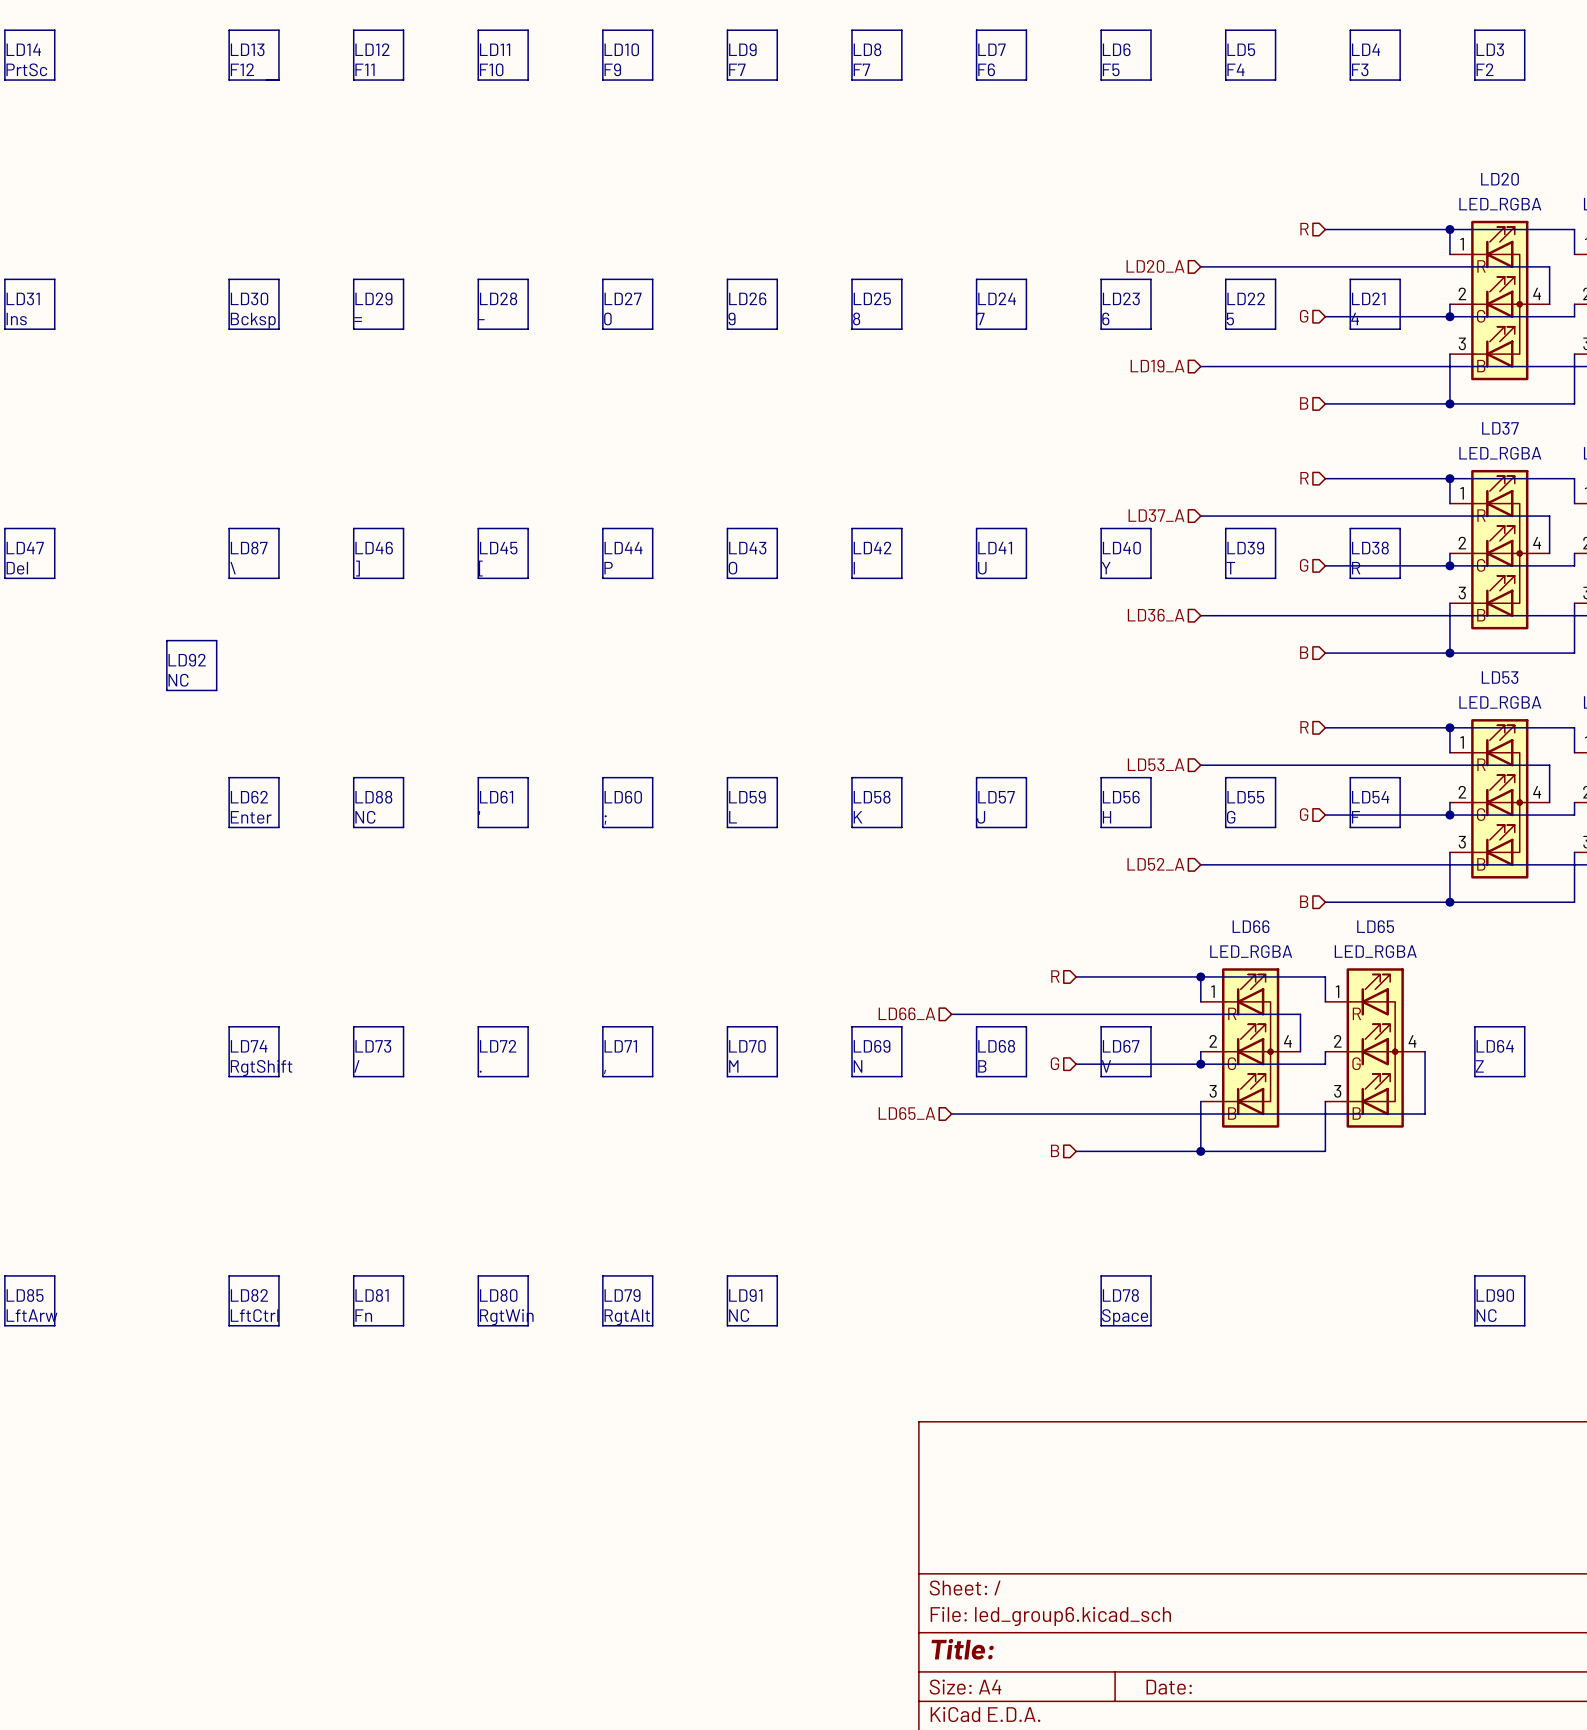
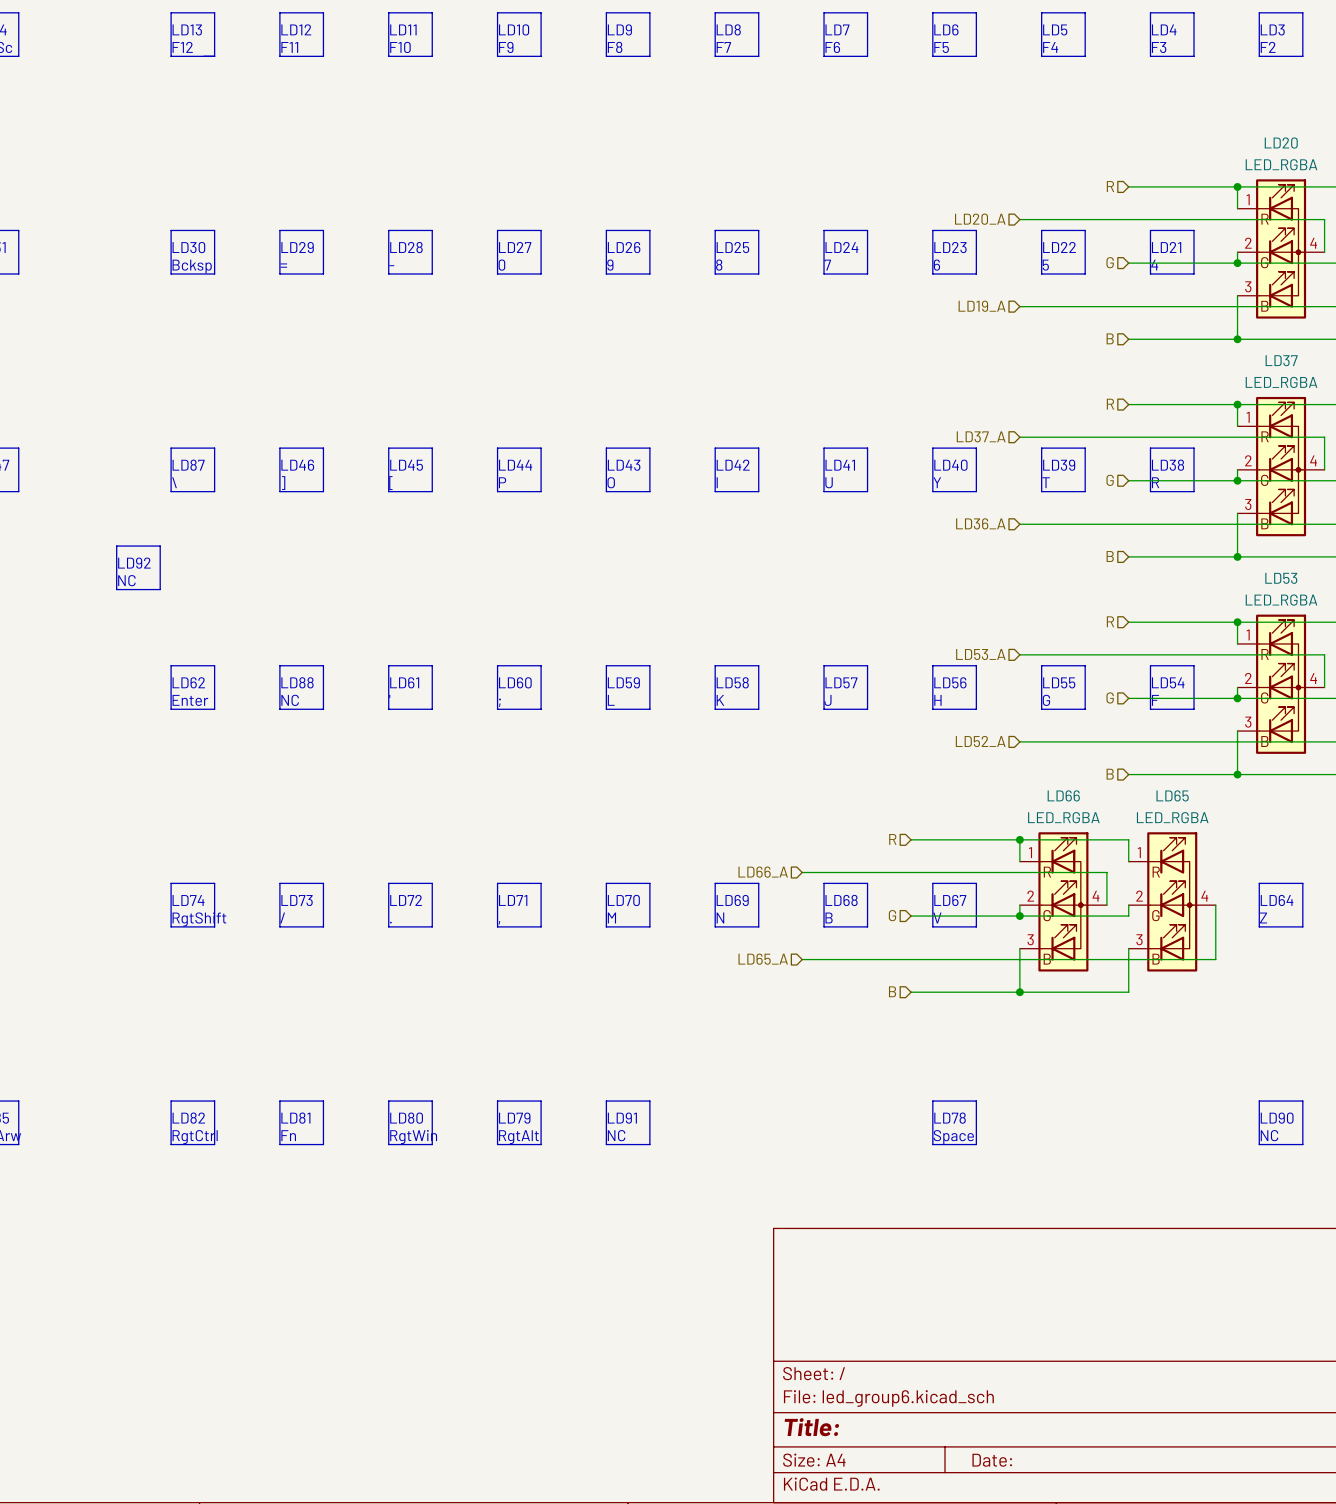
text: F7 (737, 69) -> F8 (615, 47)
text: LftCtrl (254, 1315) -> RgtCtrl (195, 1137)

